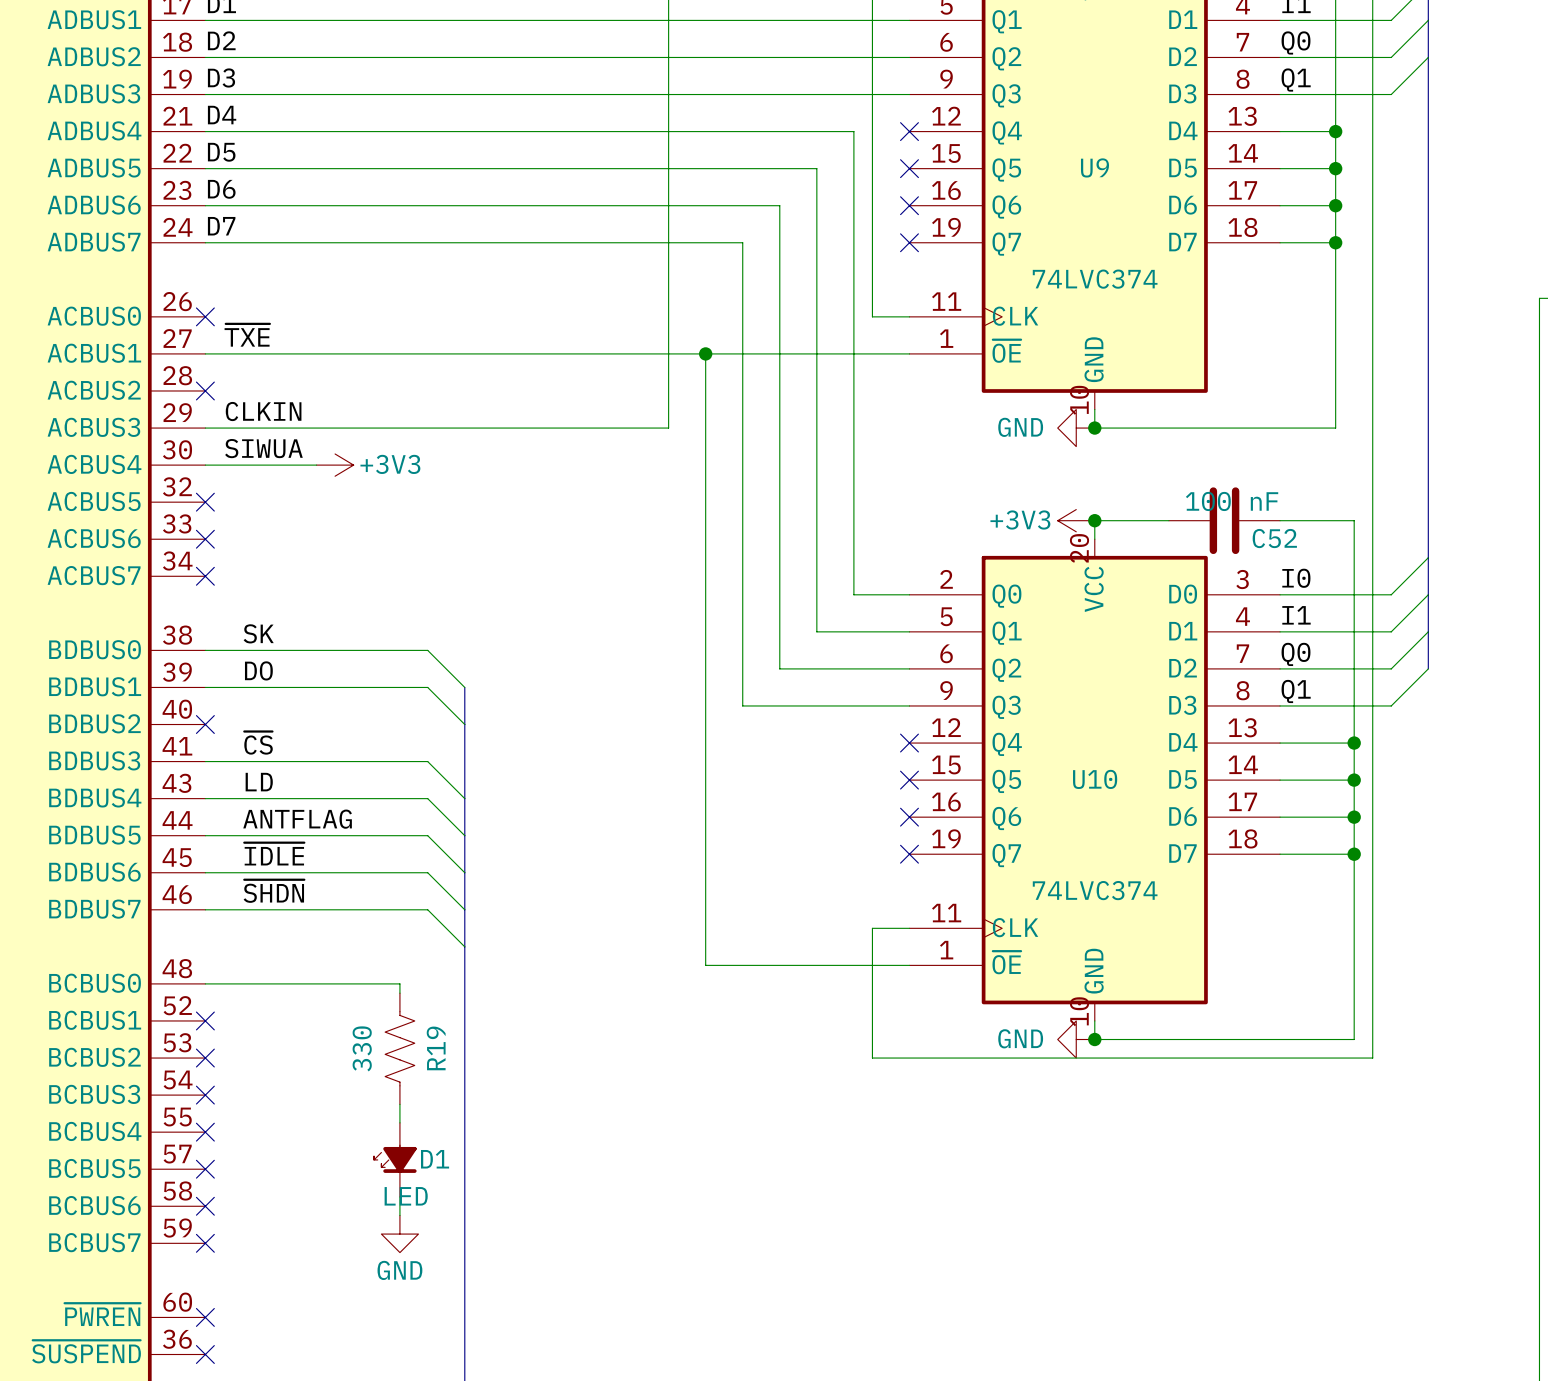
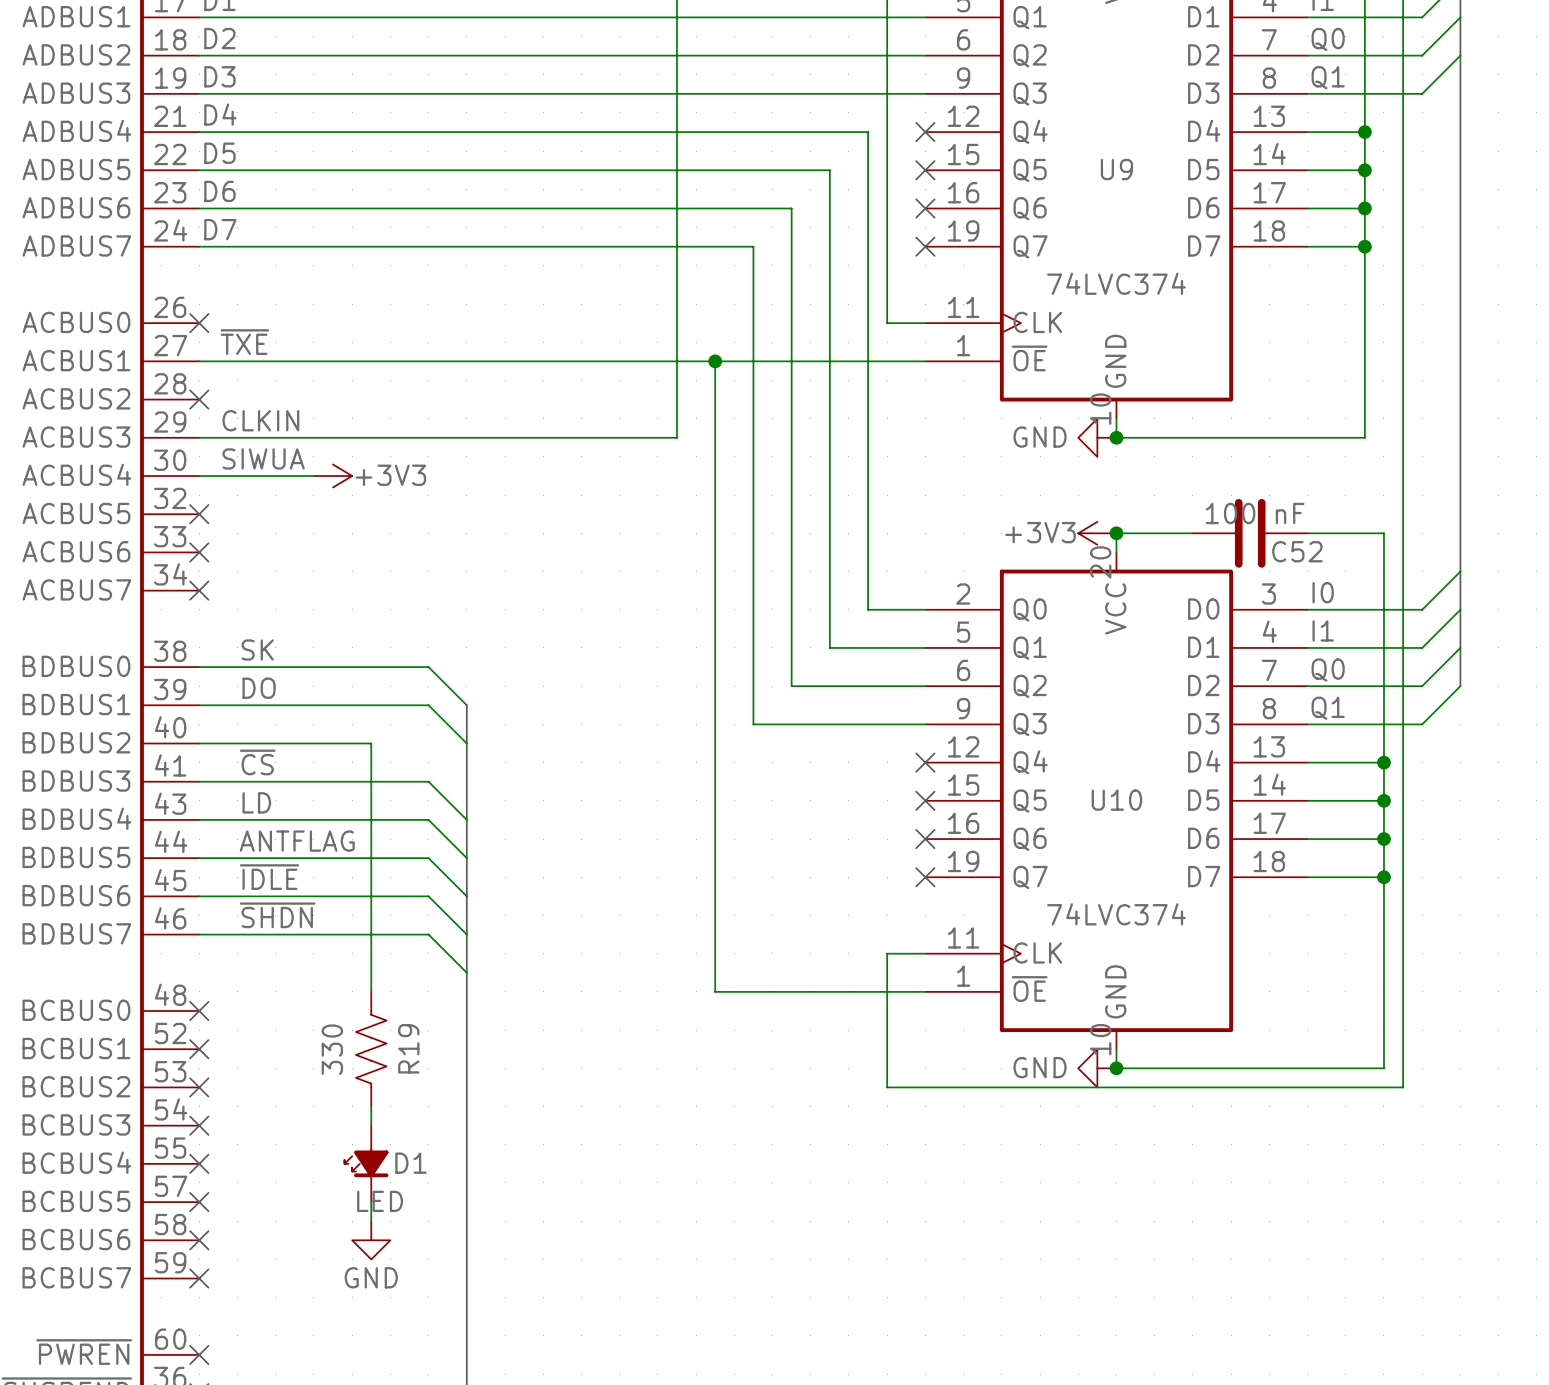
wire: none -> (199, 743) (371, 743) (371, 991)
no-connect mark: (205, 724) -> none
wire: (205, 983) (399, 983) (399, 993) -> none
no-connect mark: none -> (199, 1011)
R19 position: (399, 1048) -> (371, 1049)
wire: (399, 1104) (399, 1122) -> (371, 1106) (371, 1125)
D1 position: (395, 1159) -> (366, 1163)
wire: (399, 1197) (399, 1215) -> (371, 1202) (371, 1221)
power symbol position: GND (399, 1234) -> GND (371, 1240)

